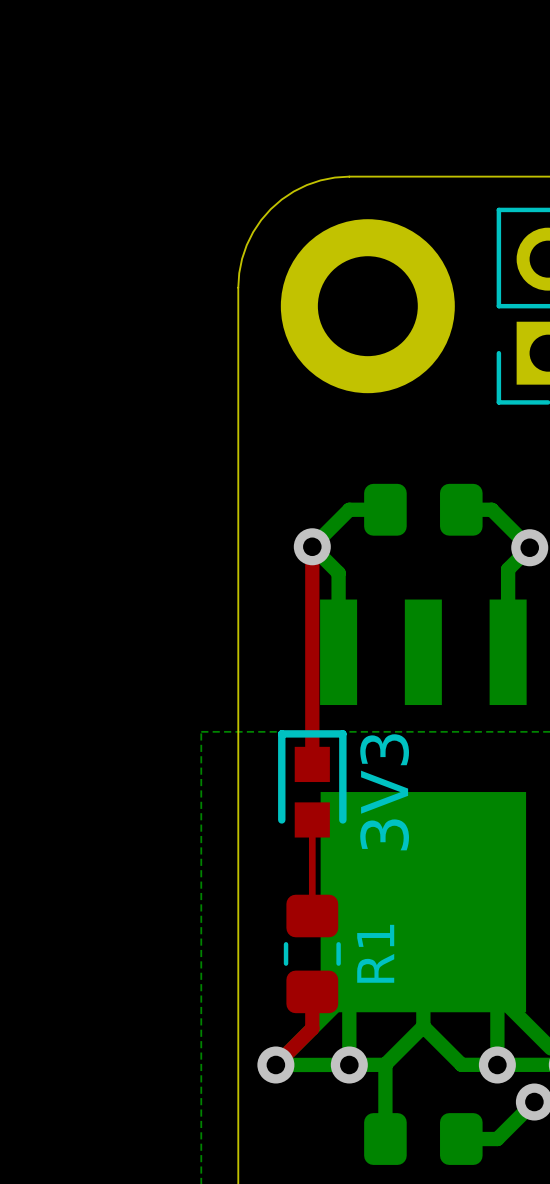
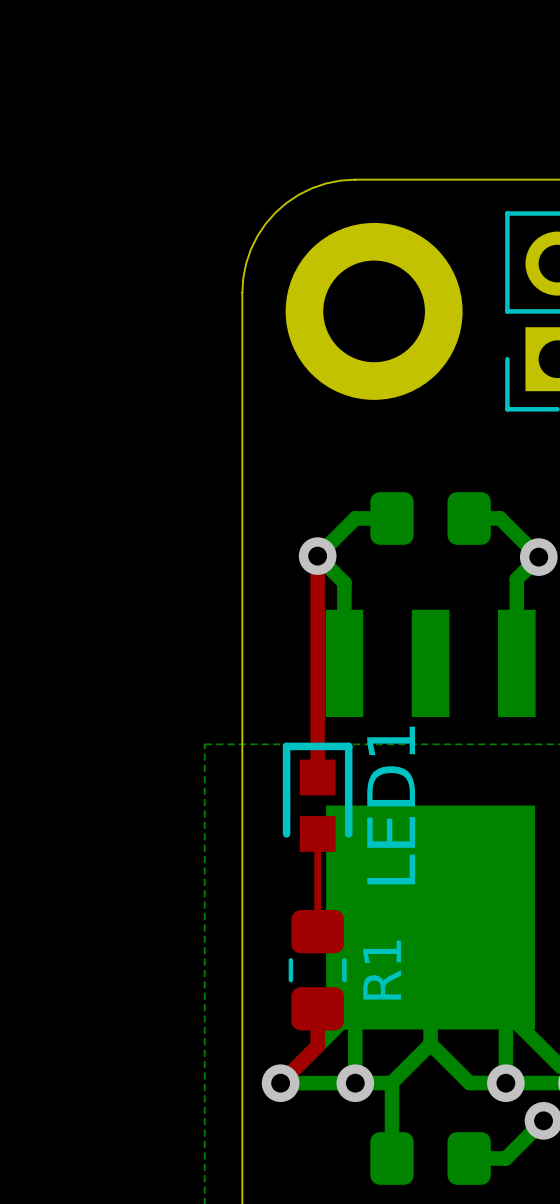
3V3 name: 3V3 (384, 792) -> LED1 (391, 805)

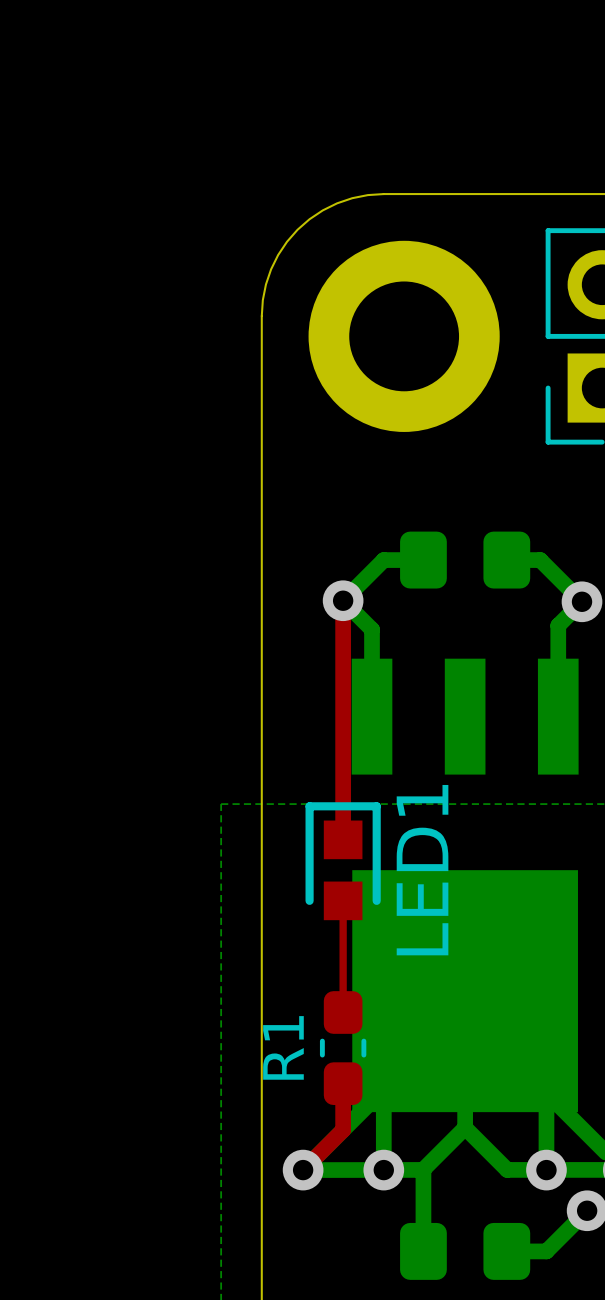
R1 footprint: [288, 910, 347, 1031] -> [319, 991, 367, 1106]
R1 name position: R1 (382, 970) -> R1 (283, 1047)

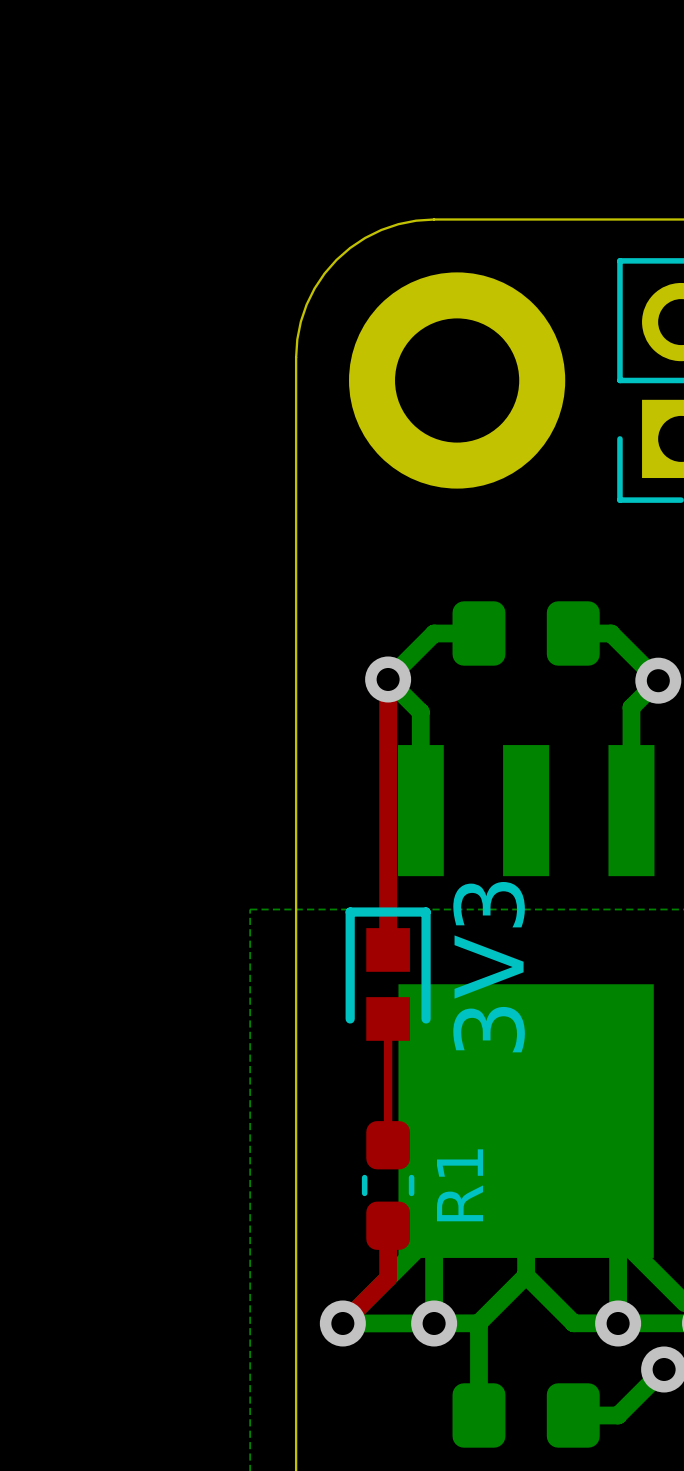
text: none -> 3V3 (489, 967)
LED1 name: LED1 (422, 870) -> none
R1 name position: R1 (283, 1047) -> R1 (460, 1185)

